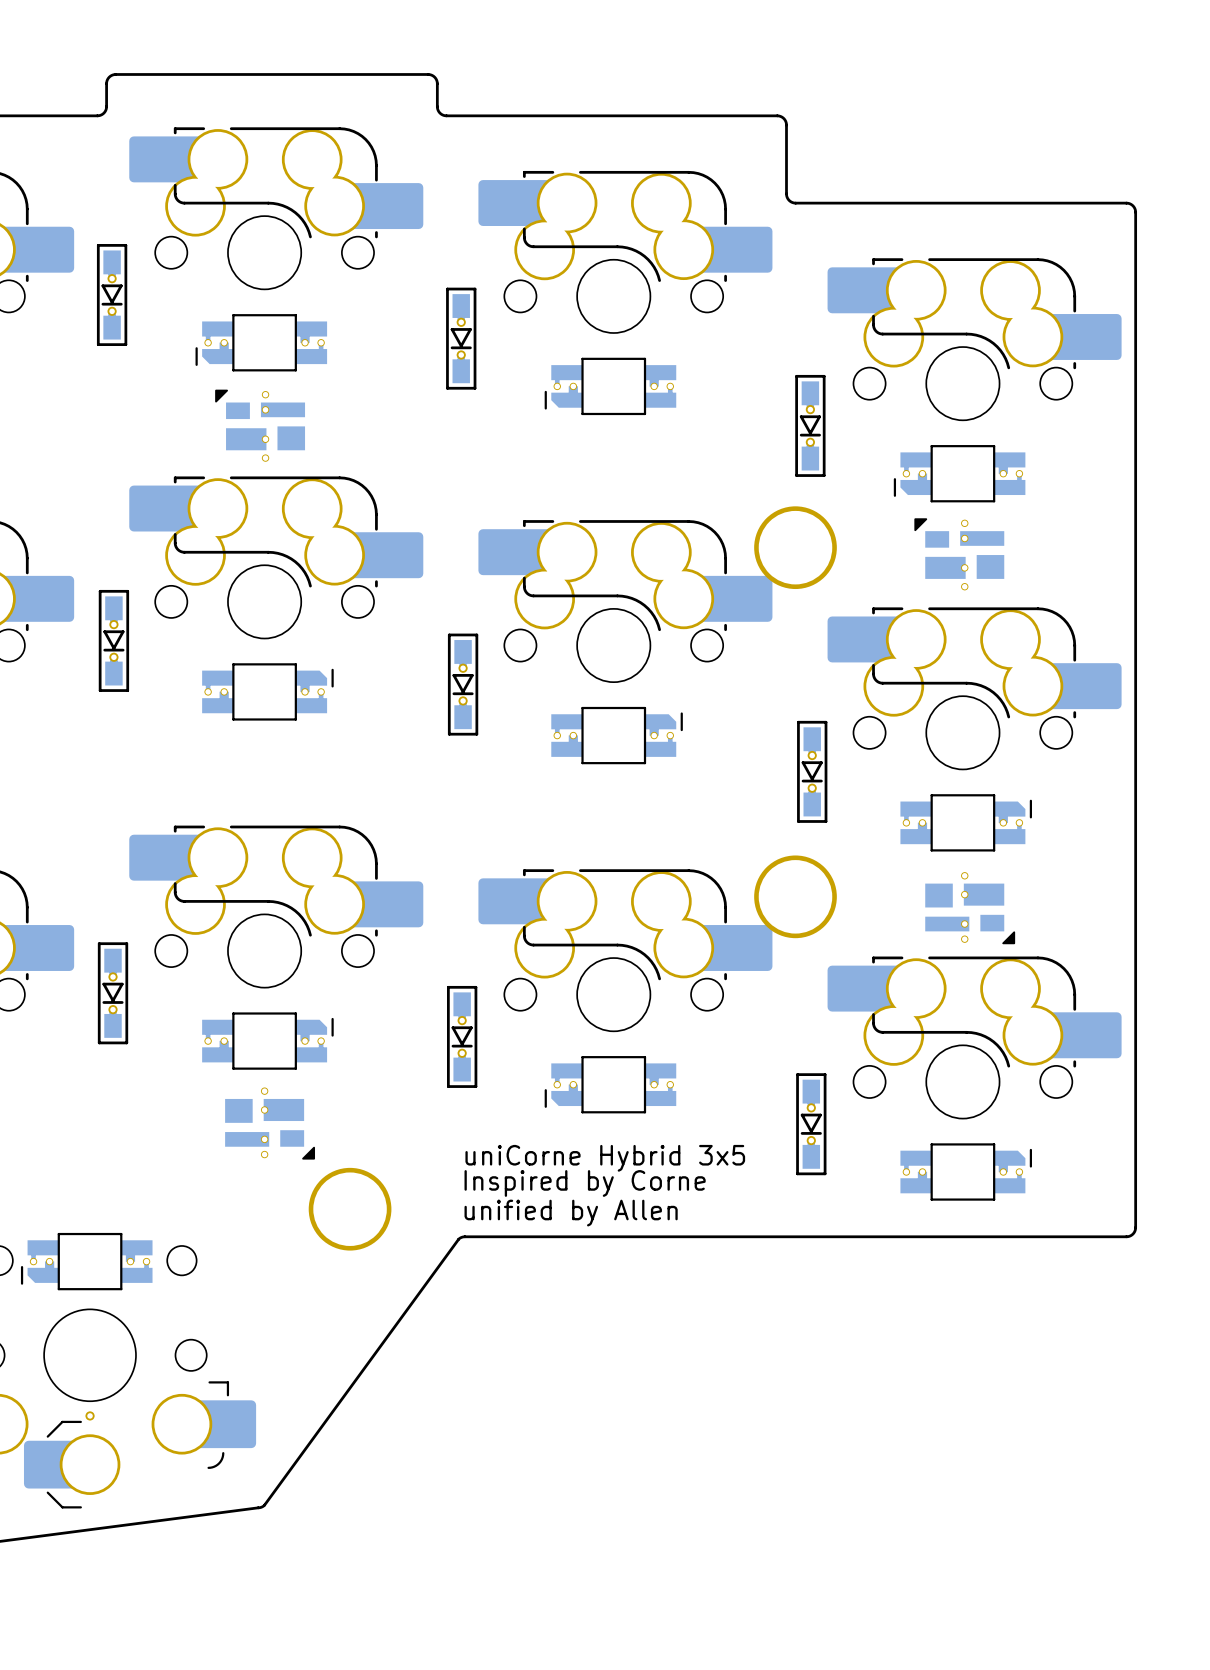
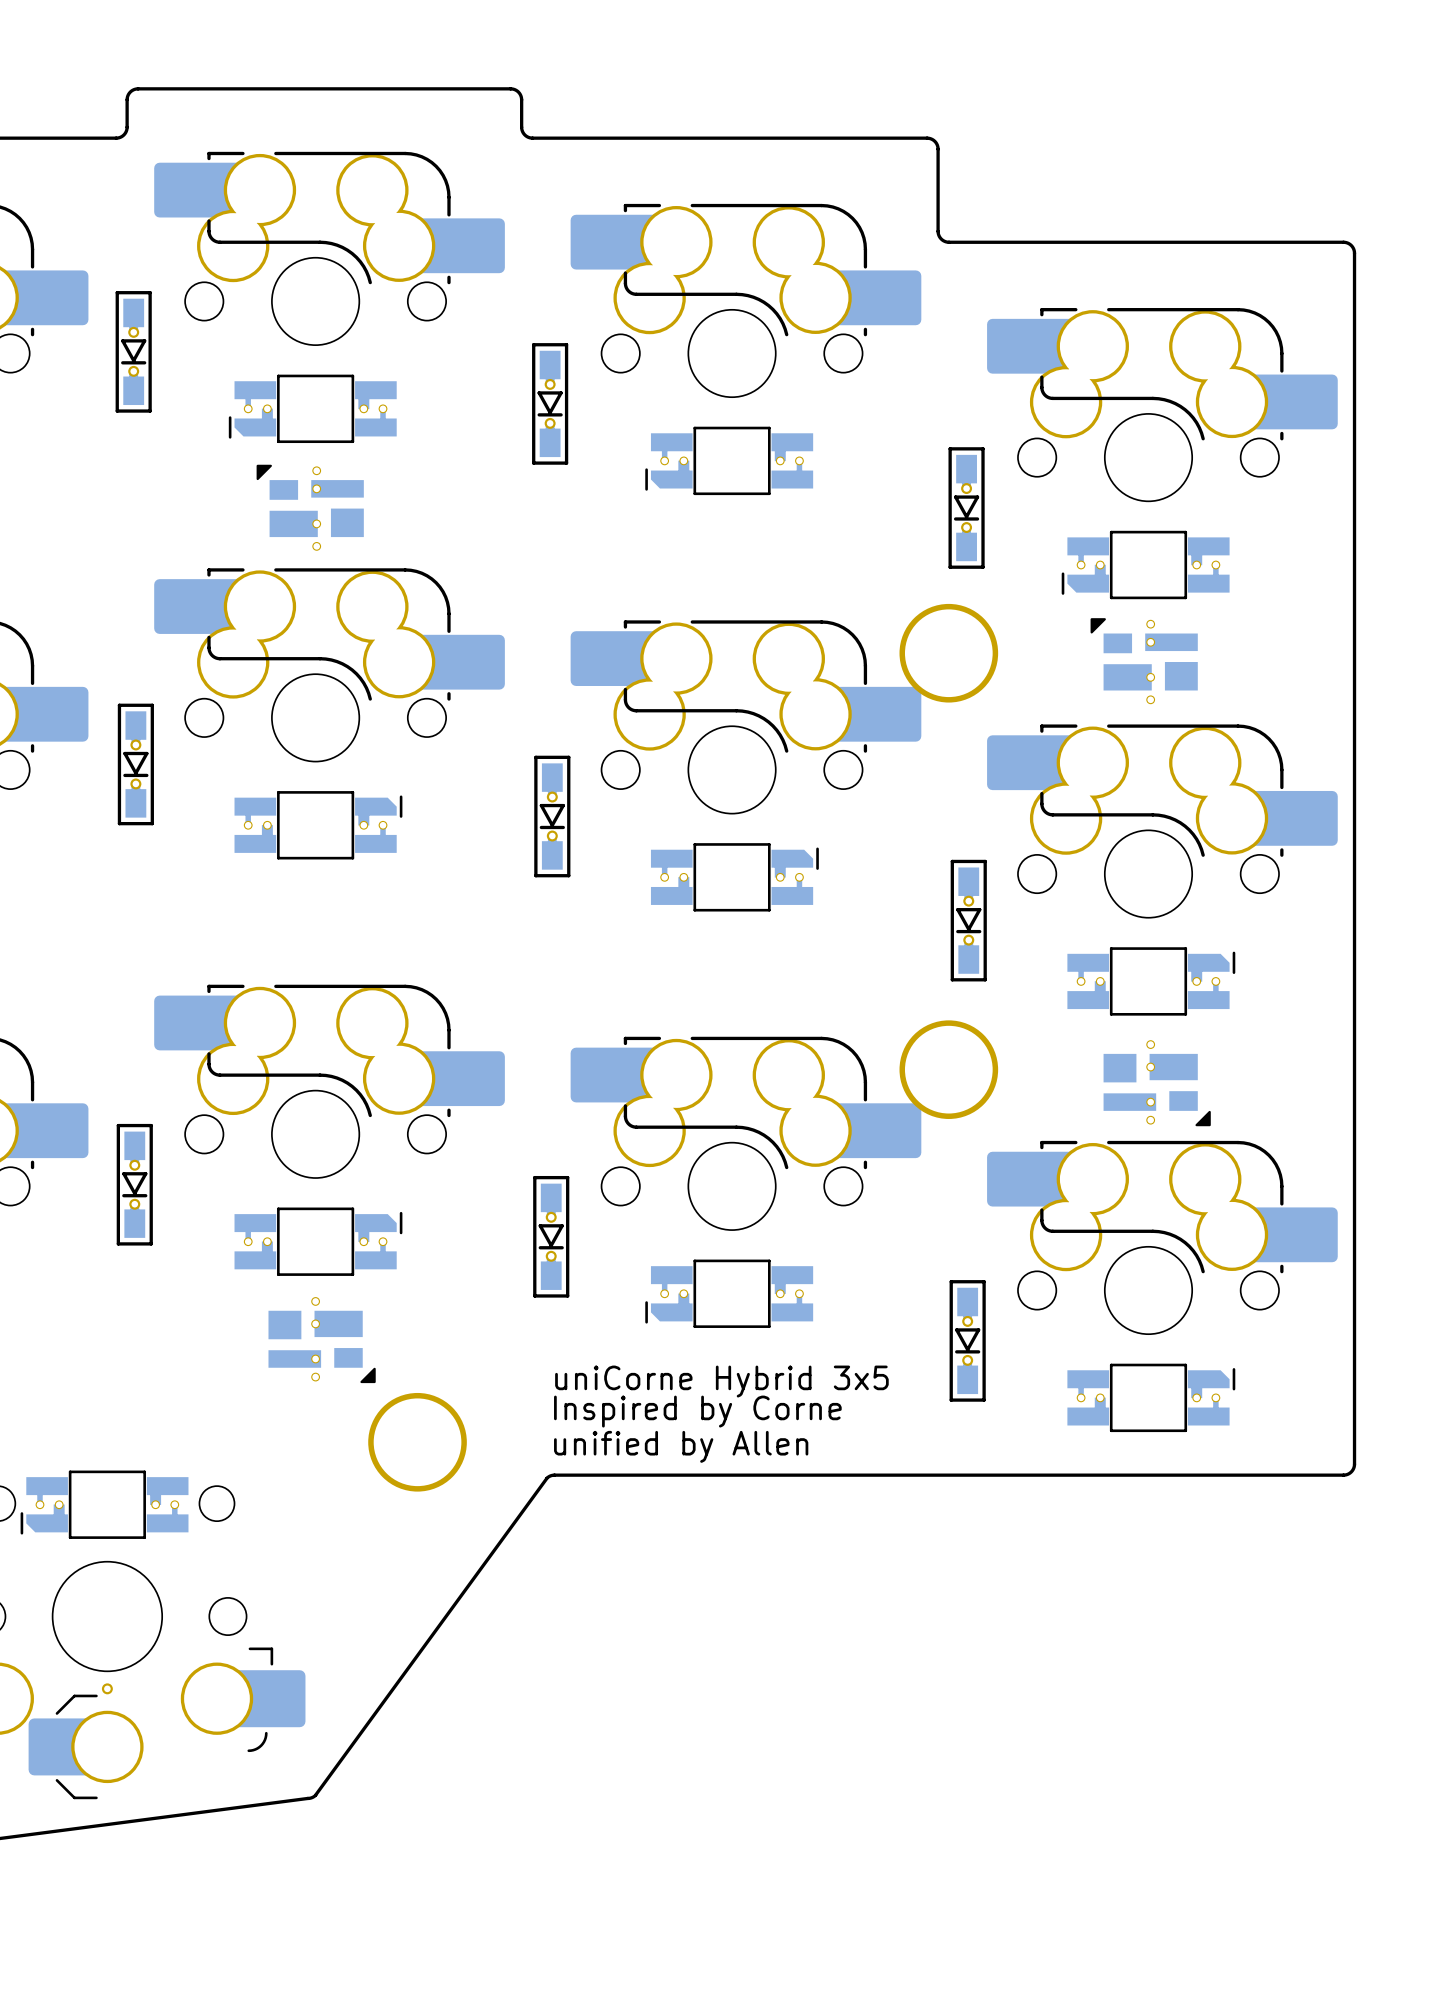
part footprint: [195, 314, 328, 372] -> [228, 374, 397, 444]
part footprint: [544, 357, 677, 416] -> [645, 426, 814, 496]
part footprint: [893, 445, 1026, 503] -> [1061, 530, 1230, 600]
part footprint: [202, 663, 334, 721] -> [234, 791, 403, 860]
part footprint: [551, 706, 683, 765] -> [650, 843, 819, 912]
part footprint: [900, 794, 1033, 852] -> [1067, 947, 1236, 1016]
part footprint: [202, 1012, 334, 1070] -> [234, 1207, 403, 1276]
part footprint: [544, 1056, 677, 1114] -> [645, 1259, 814, 1328]
part footprint: [900, 1143, 1033, 1201] -> [1067, 1363, 1236, 1433]
part footprint: [20, 1232, 153, 1291] -> [20, 1470, 189, 1539]

